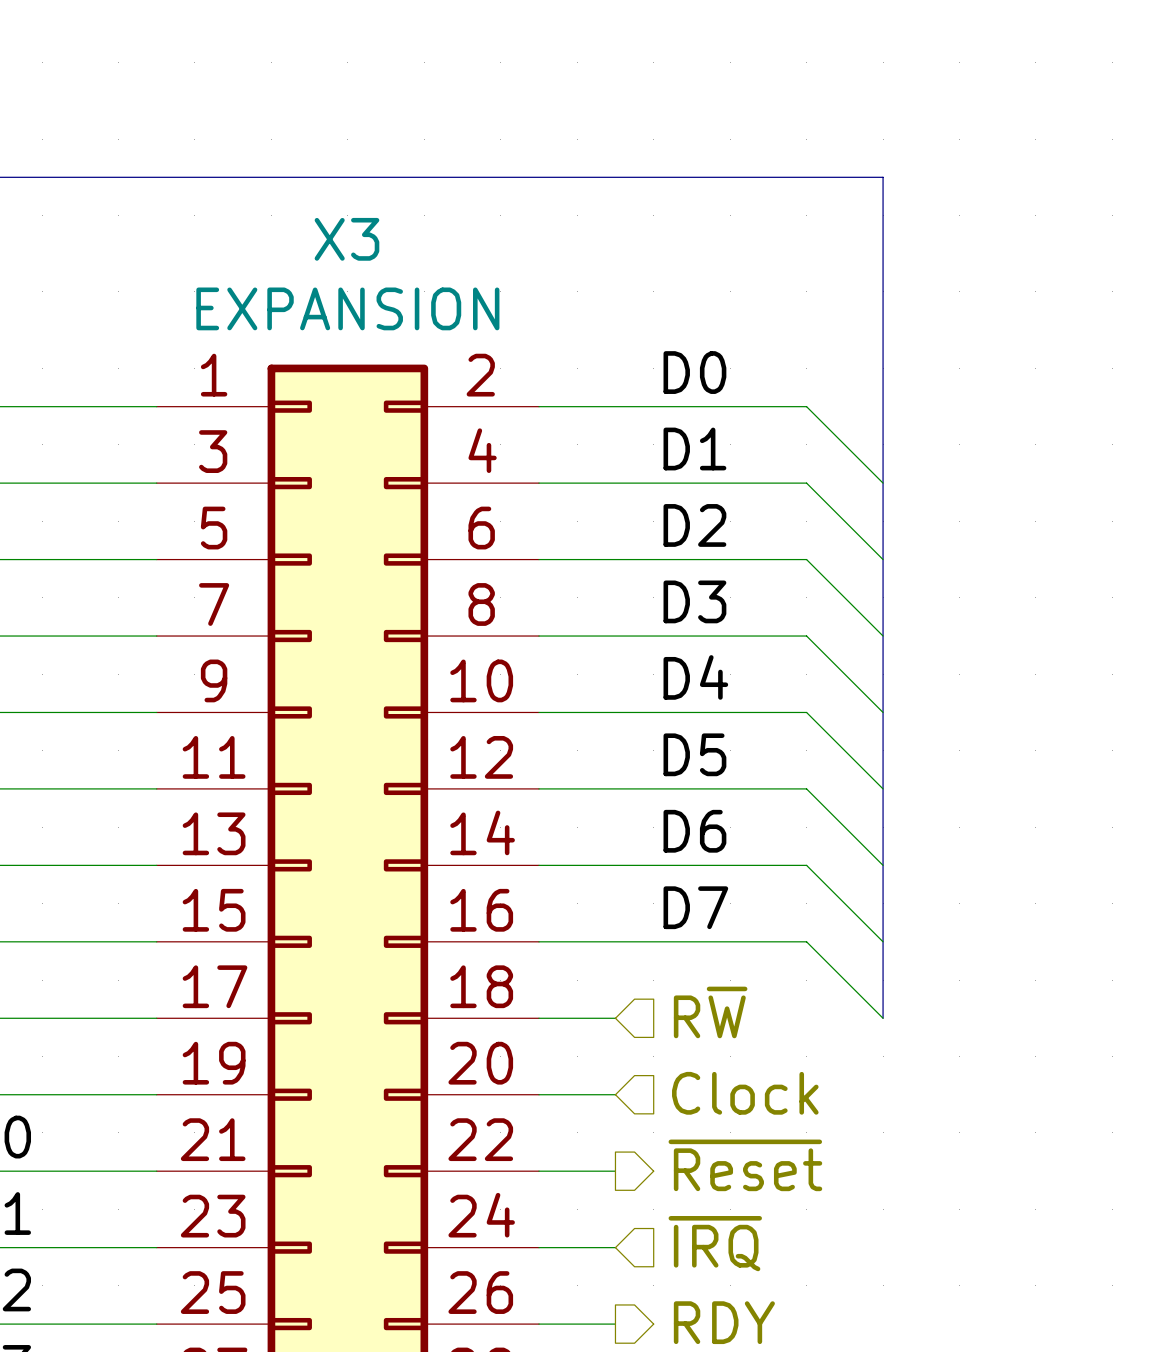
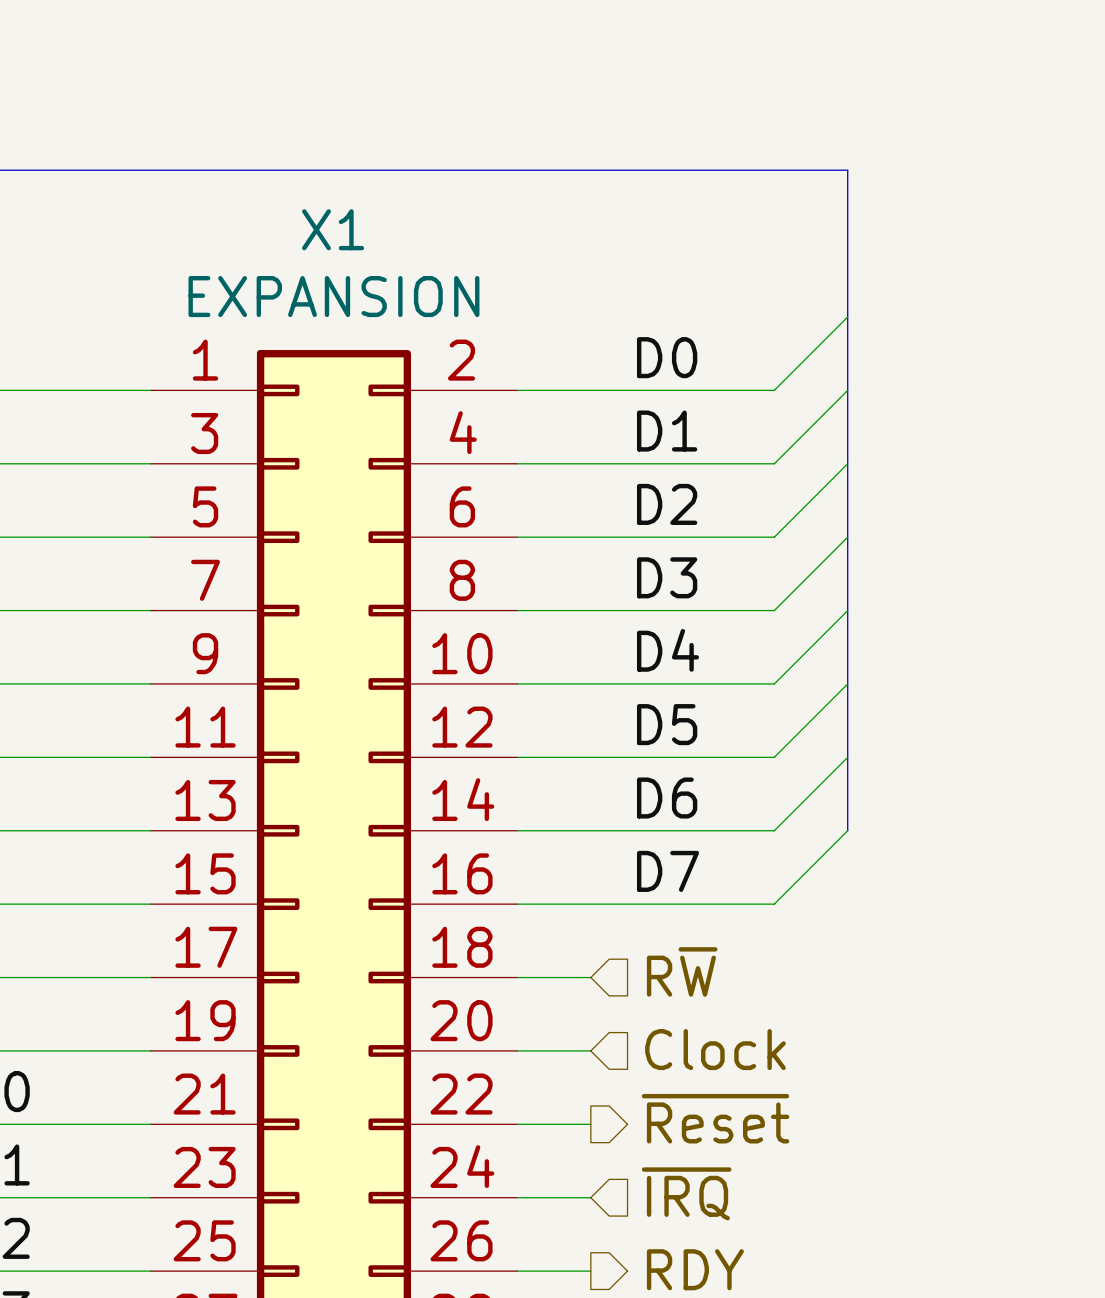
X3 name: X3 (346, 239) -> X1 (333, 229)
wire: (806, 406) (883, 483) -> (774, 390) (847, 317)
wire: (806, 483) (883, 559) -> (774, 463) (847, 390)
wire: (806, 559) (883, 636) -> (774, 537) (847, 463)
wire: (806, 636) (883, 712) -> (774, 610) (847, 537)
wire: none -> (847, 610) (774, 683)
wire: (806, 712) (883, 788) -> (774, 830) (847, 757)
wire: (806, 788) (883, 865) -> (774, 757) (847, 683)
wire: (806, 865) (883, 941) -> none
bus: (883, 865) (883, 1018) -> none
wire: (806, 941) (883, 1018) -> (774, 904) (847, 830)

